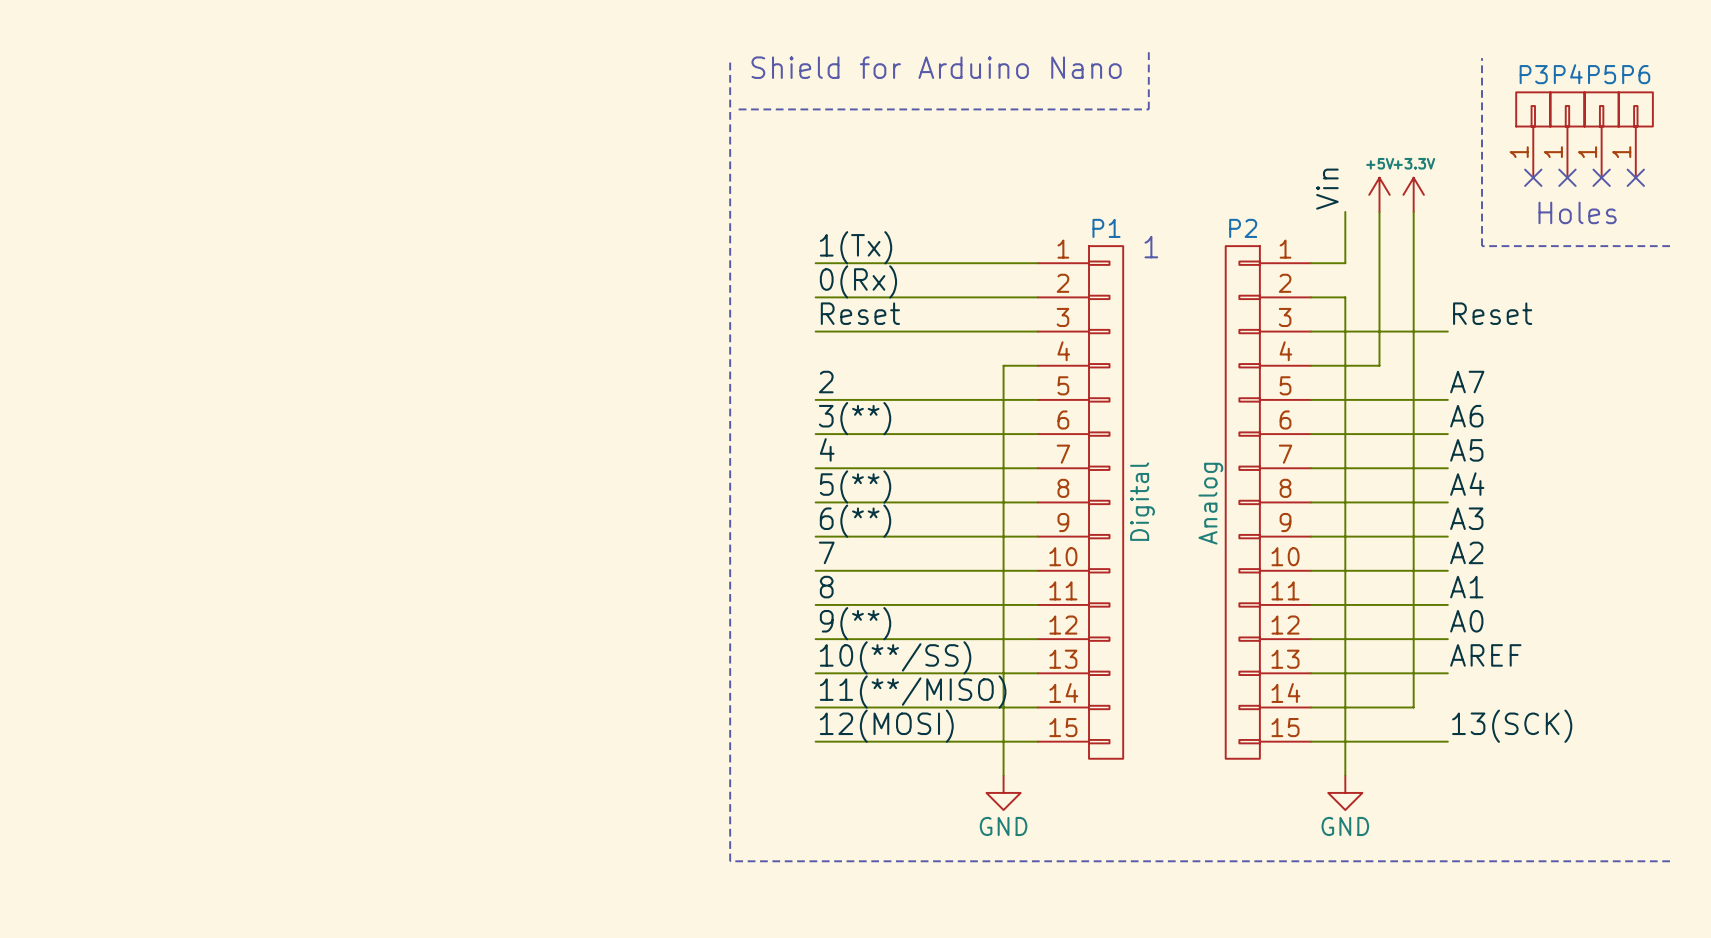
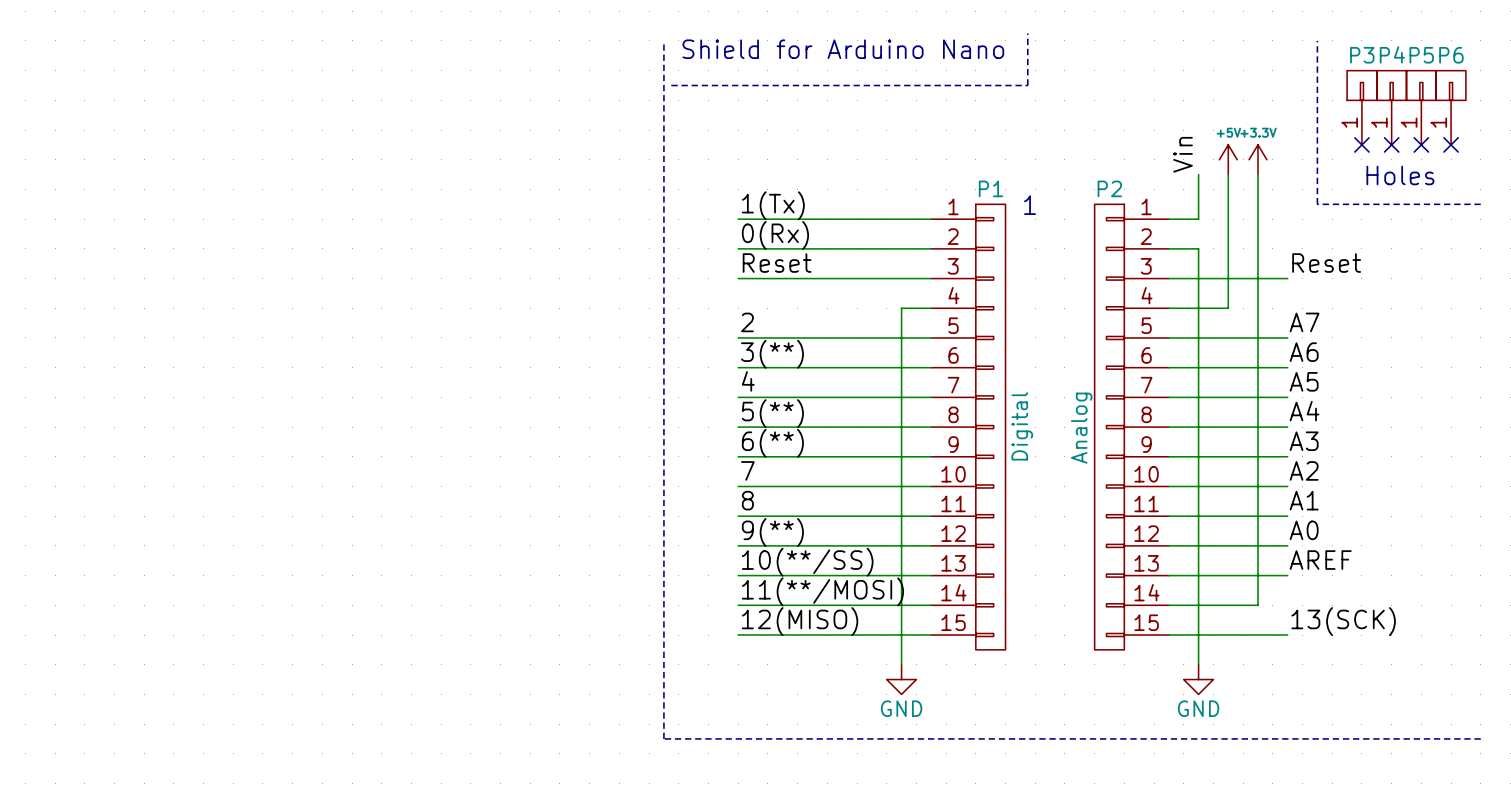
label: 11(**/MISO) (913, 692) -> 11(**/MOSI) (822, 591)
label: 12(MOSI) (886, 726) -> 12(MISO) (800, 621)

